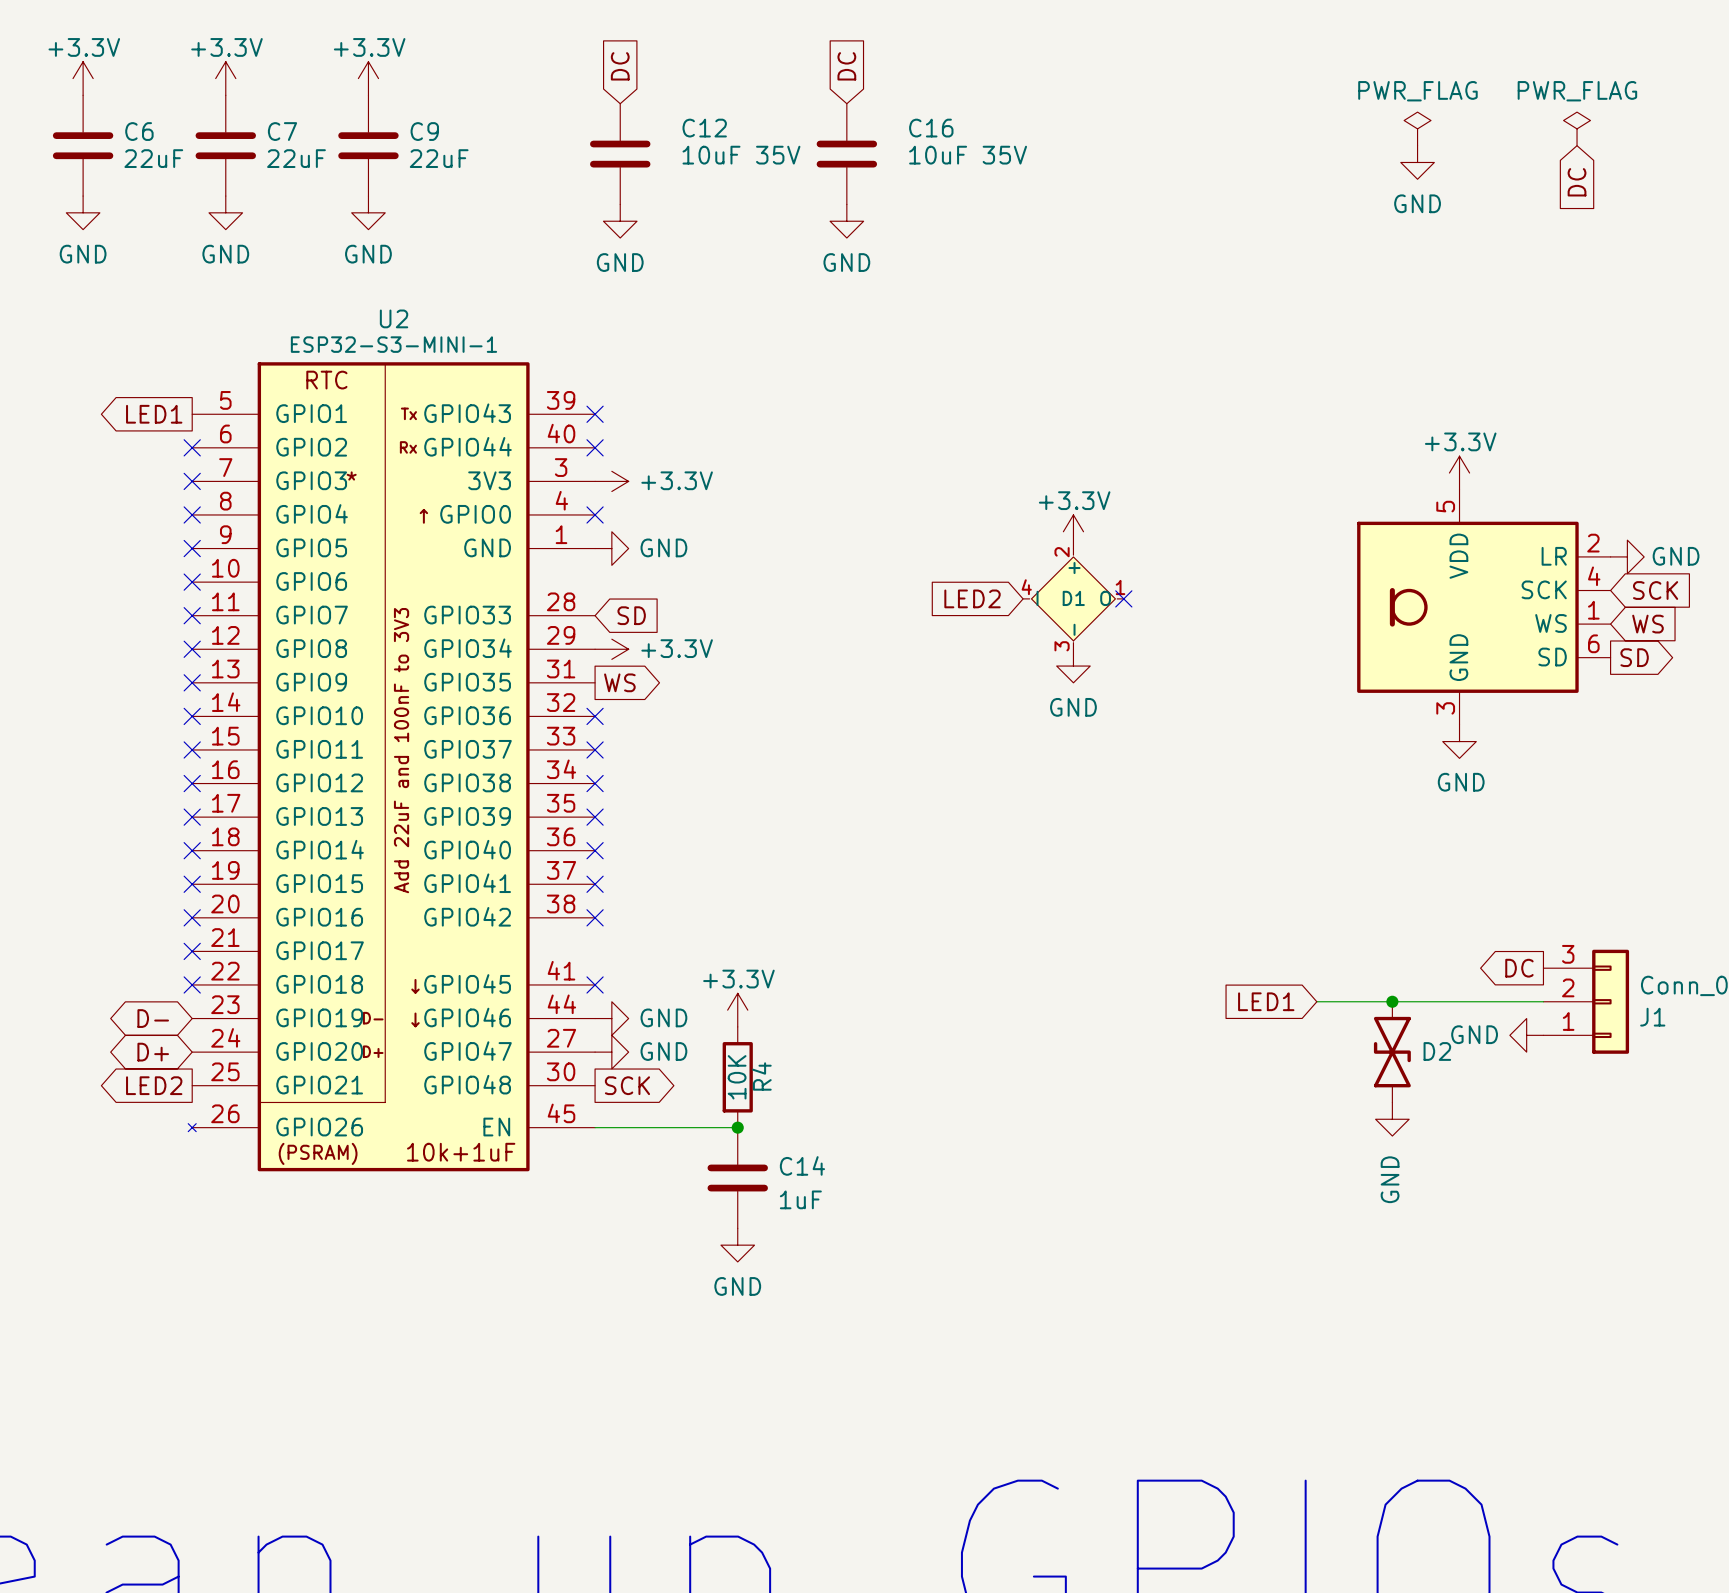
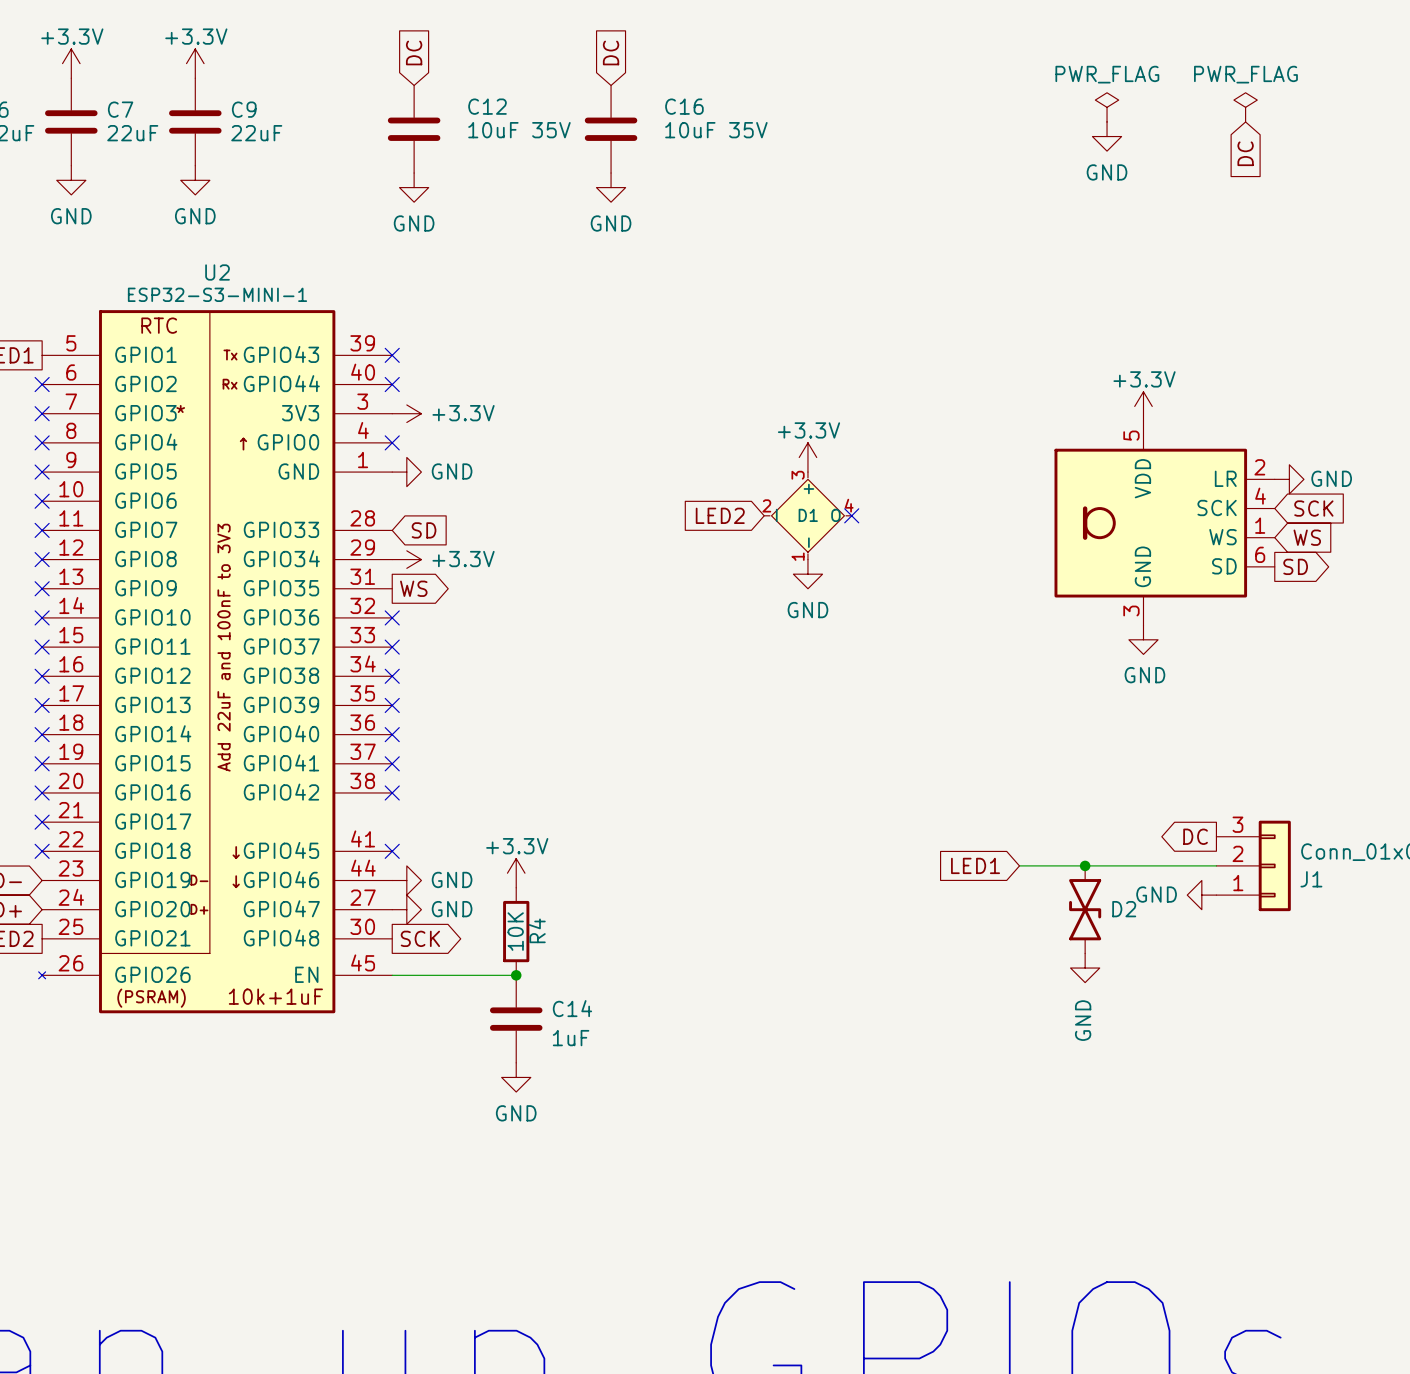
D1 pin number: 2 (1062, 552) -> 3 (798, 475)
D1 pin number: 4 (1026, 587) -> 2 (766, 505)
D1 pin number: 1 (1120, 587) -> 4 (849, 505)
D1 pin number: 3 (1062, 646) -> 1 (798, 556)

